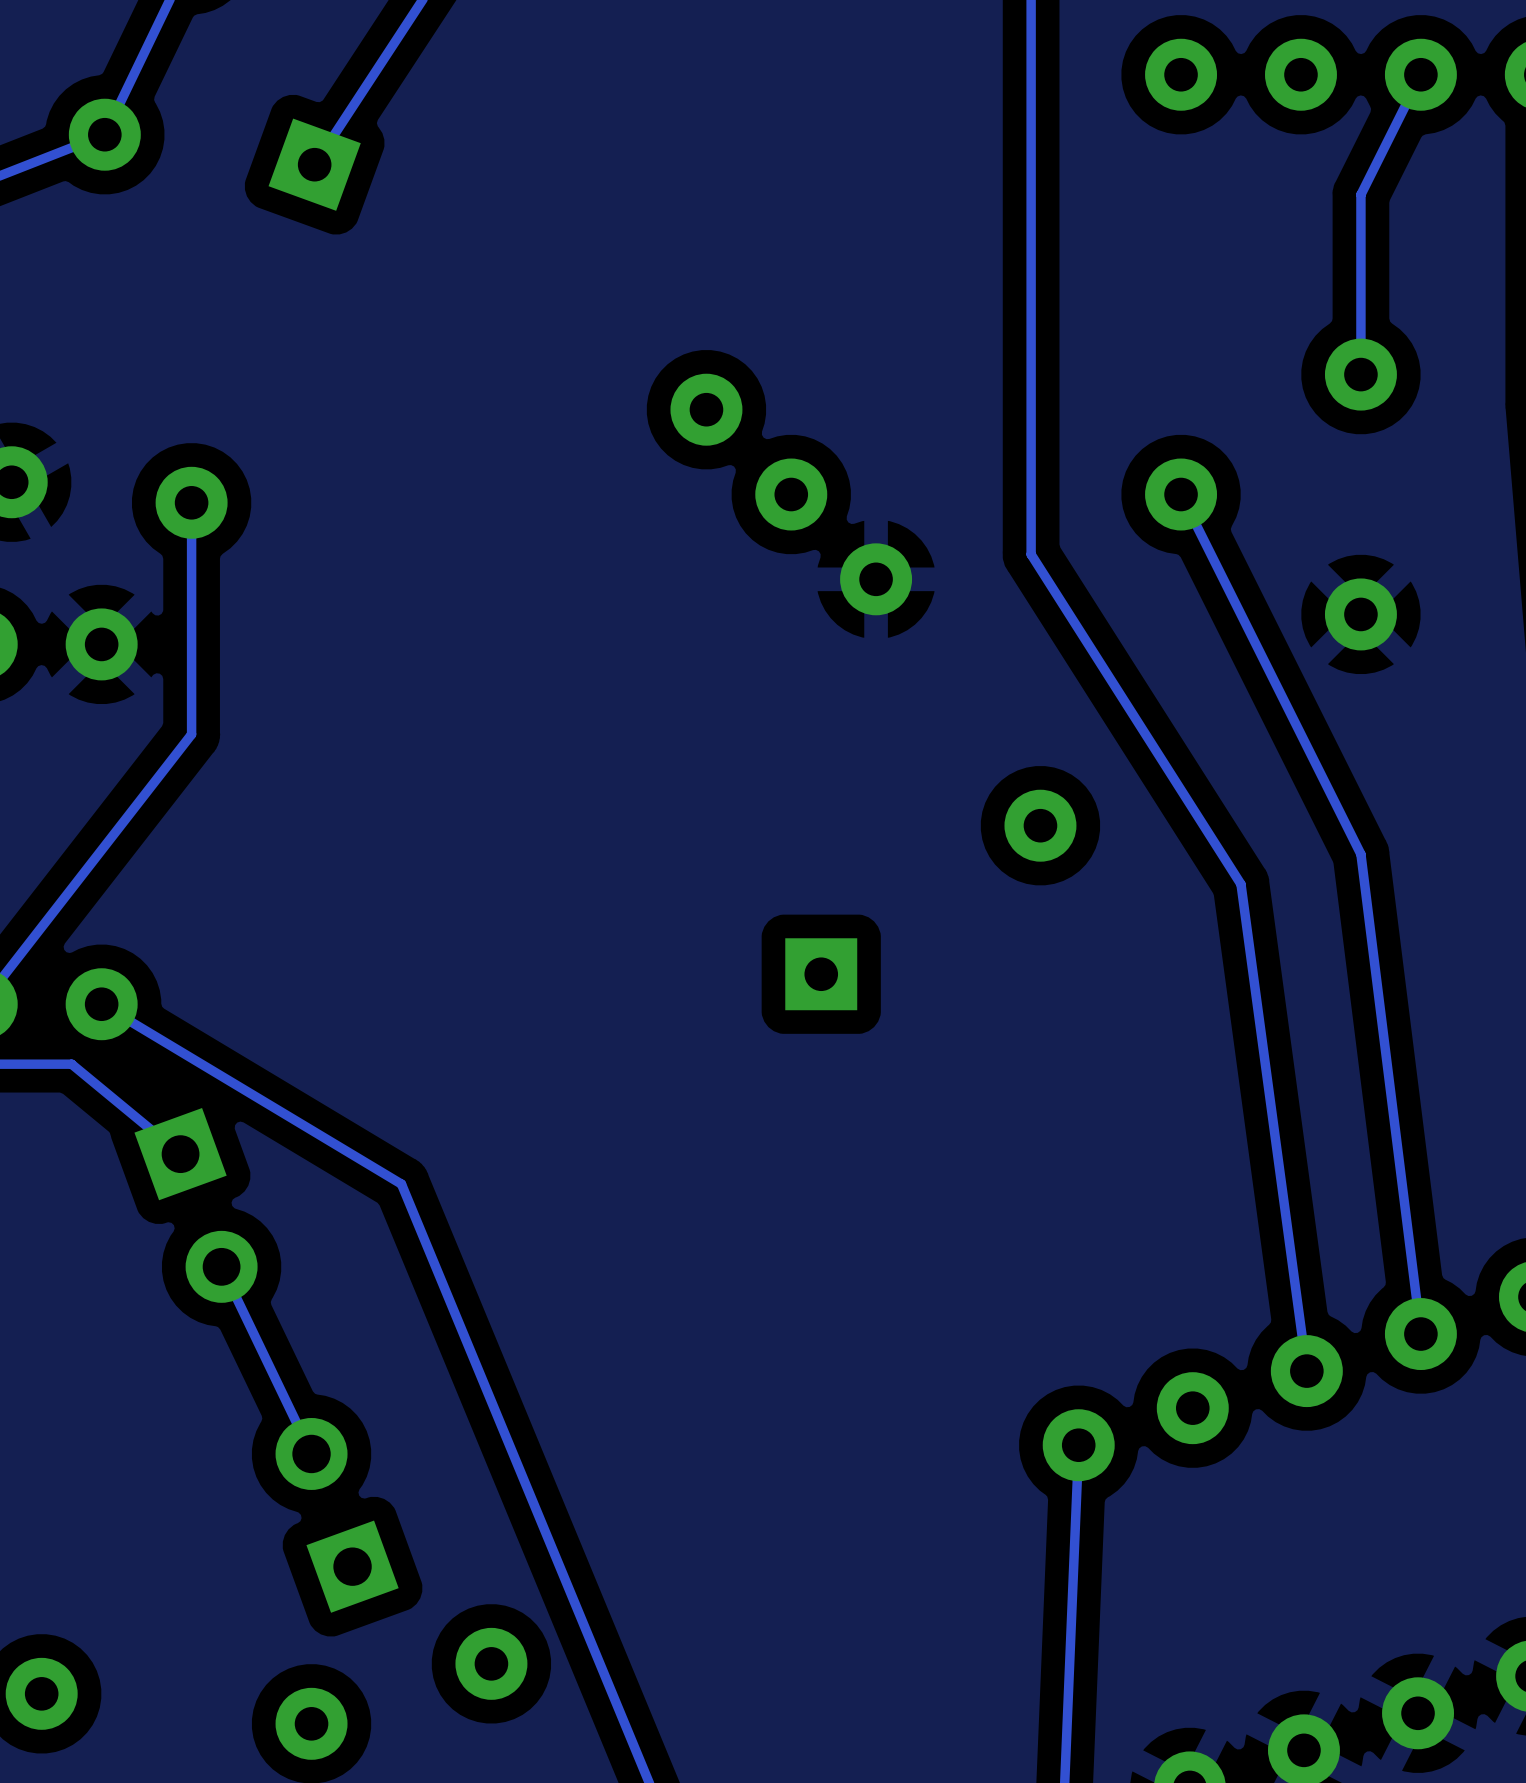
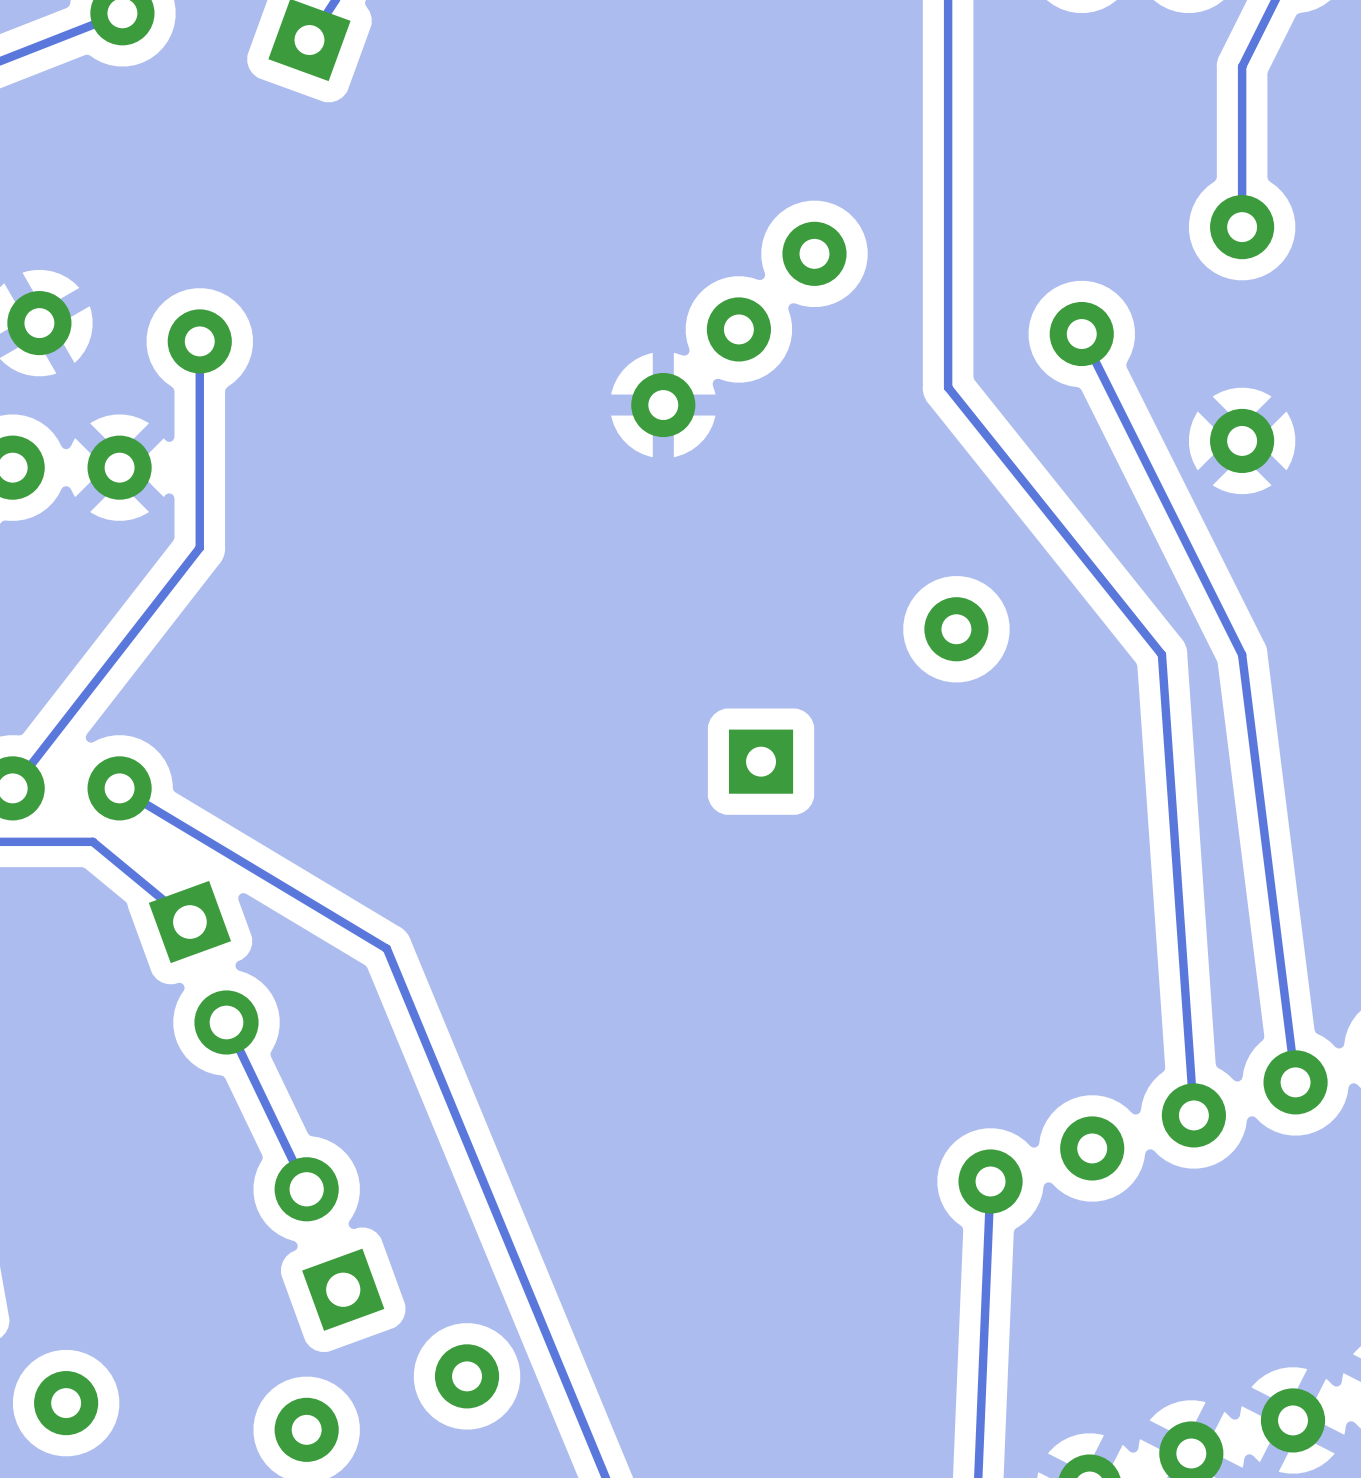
part rotation: 0° (791, 494) -> 90° clockwise (738, 329)
track: (1031, 554) (1241, 884) (1306, 1371) -> (948, 387) (1161, 654) (1193, 1115)

